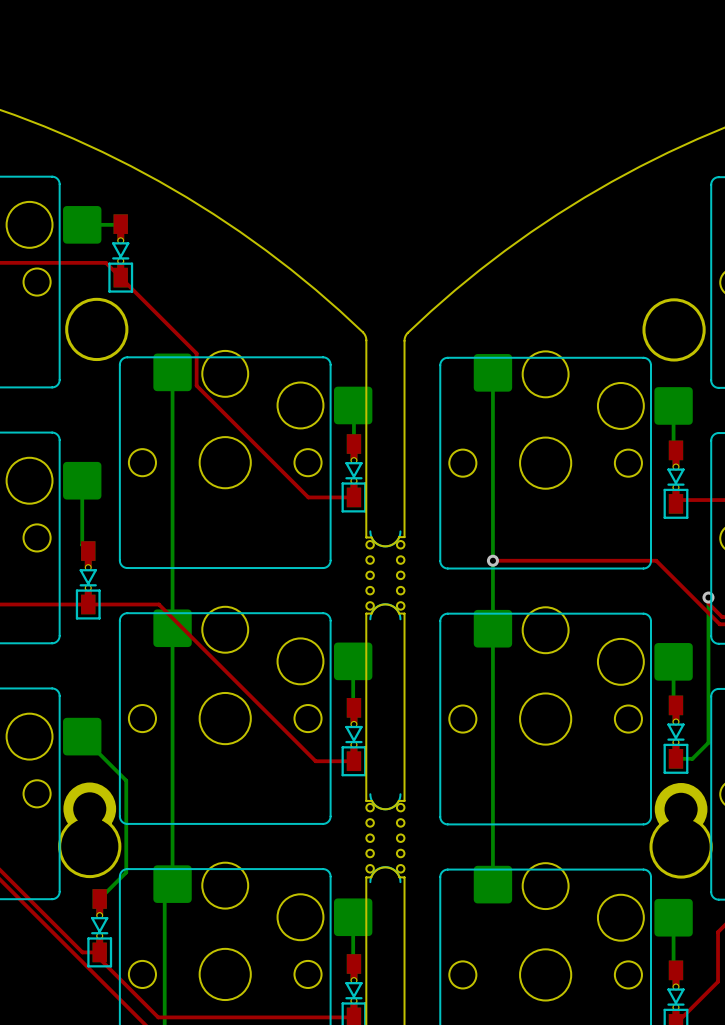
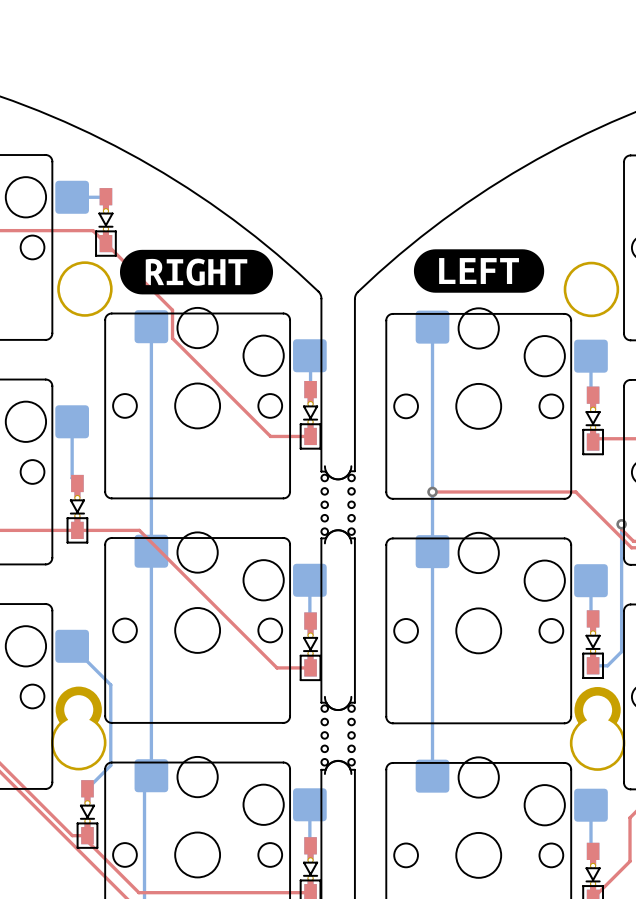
drawing: none -> [119, 249, 274, 295]
drawing: none -> [413, 249, 545, 293]

